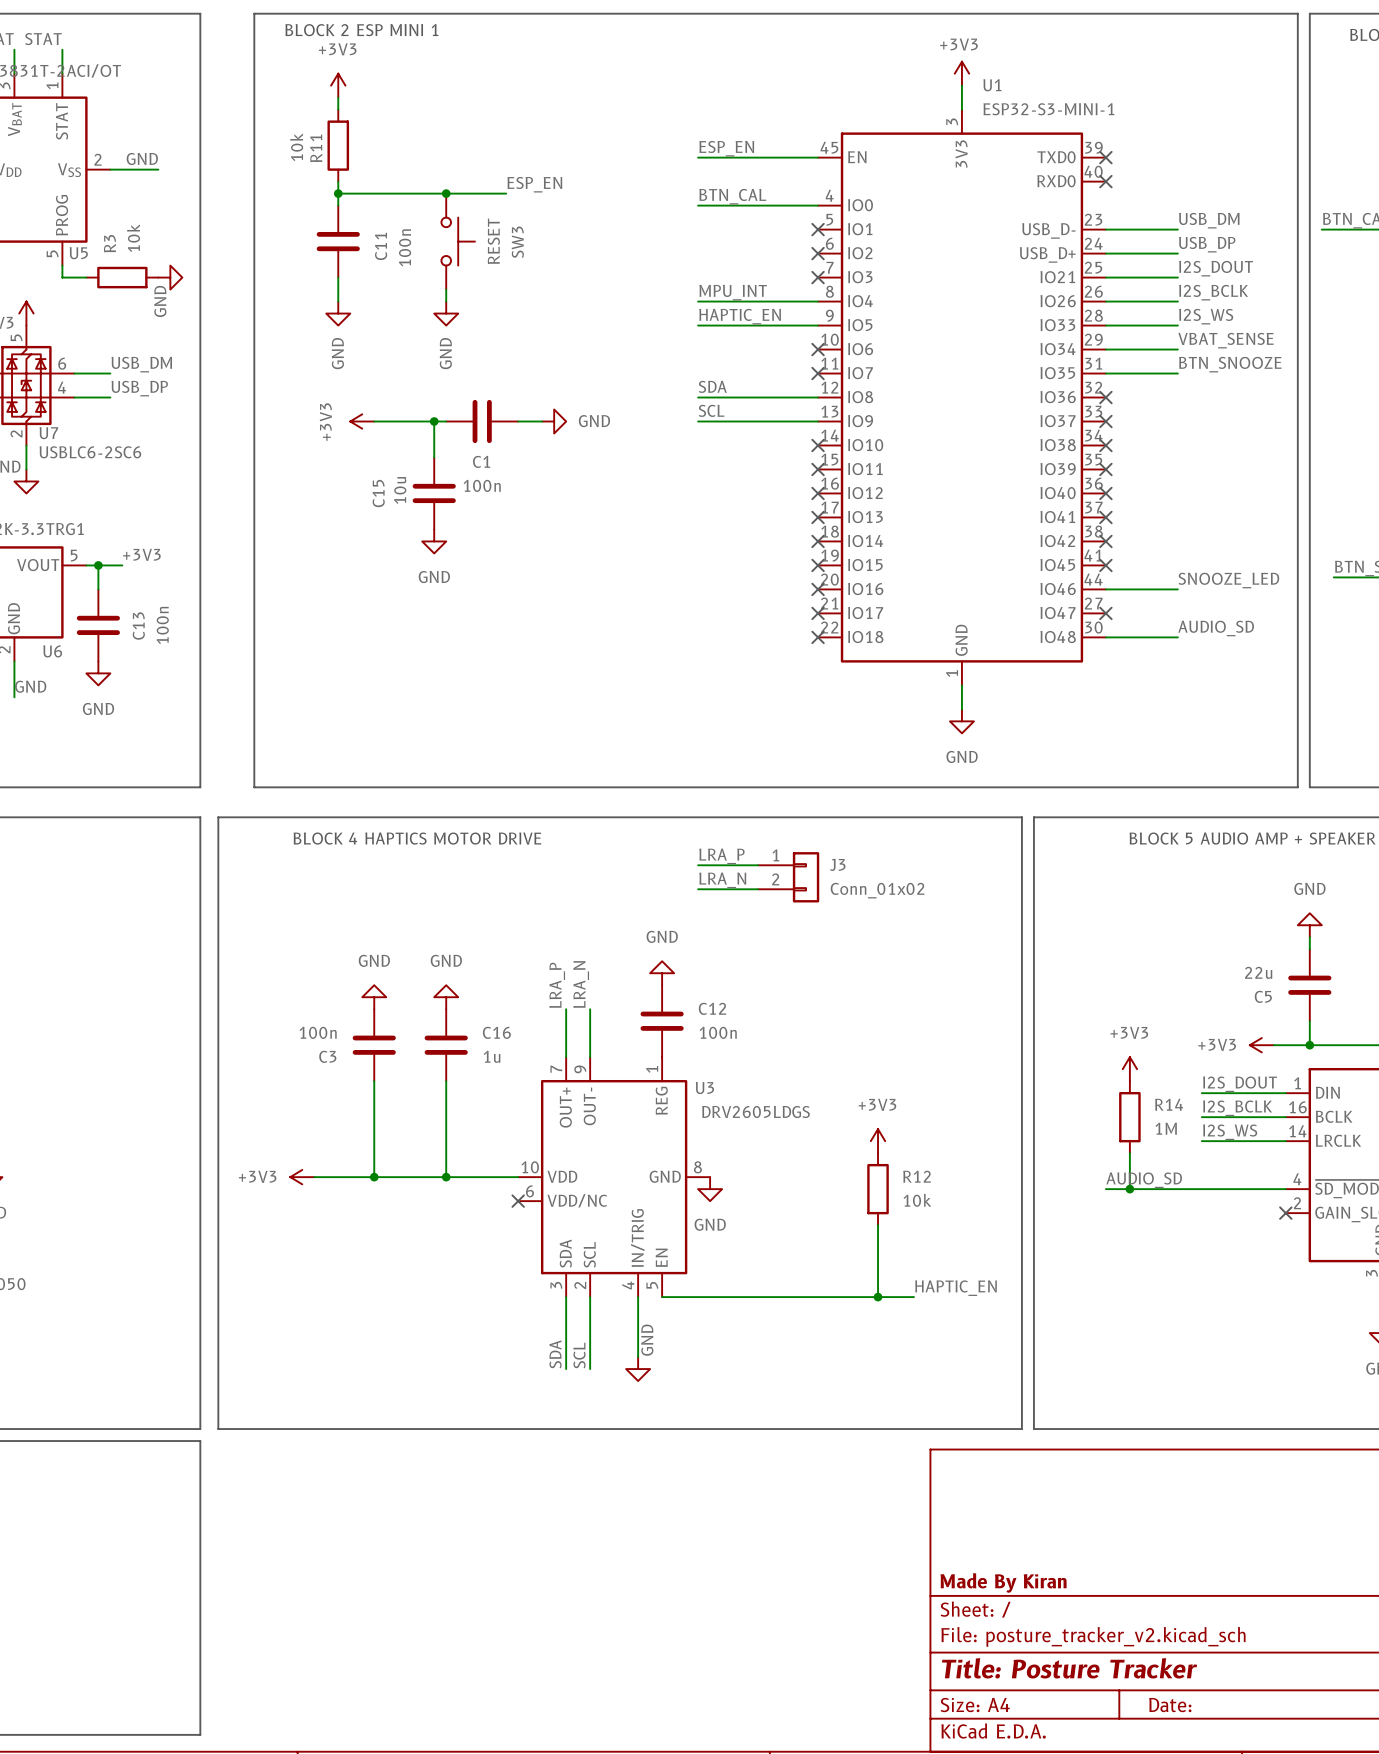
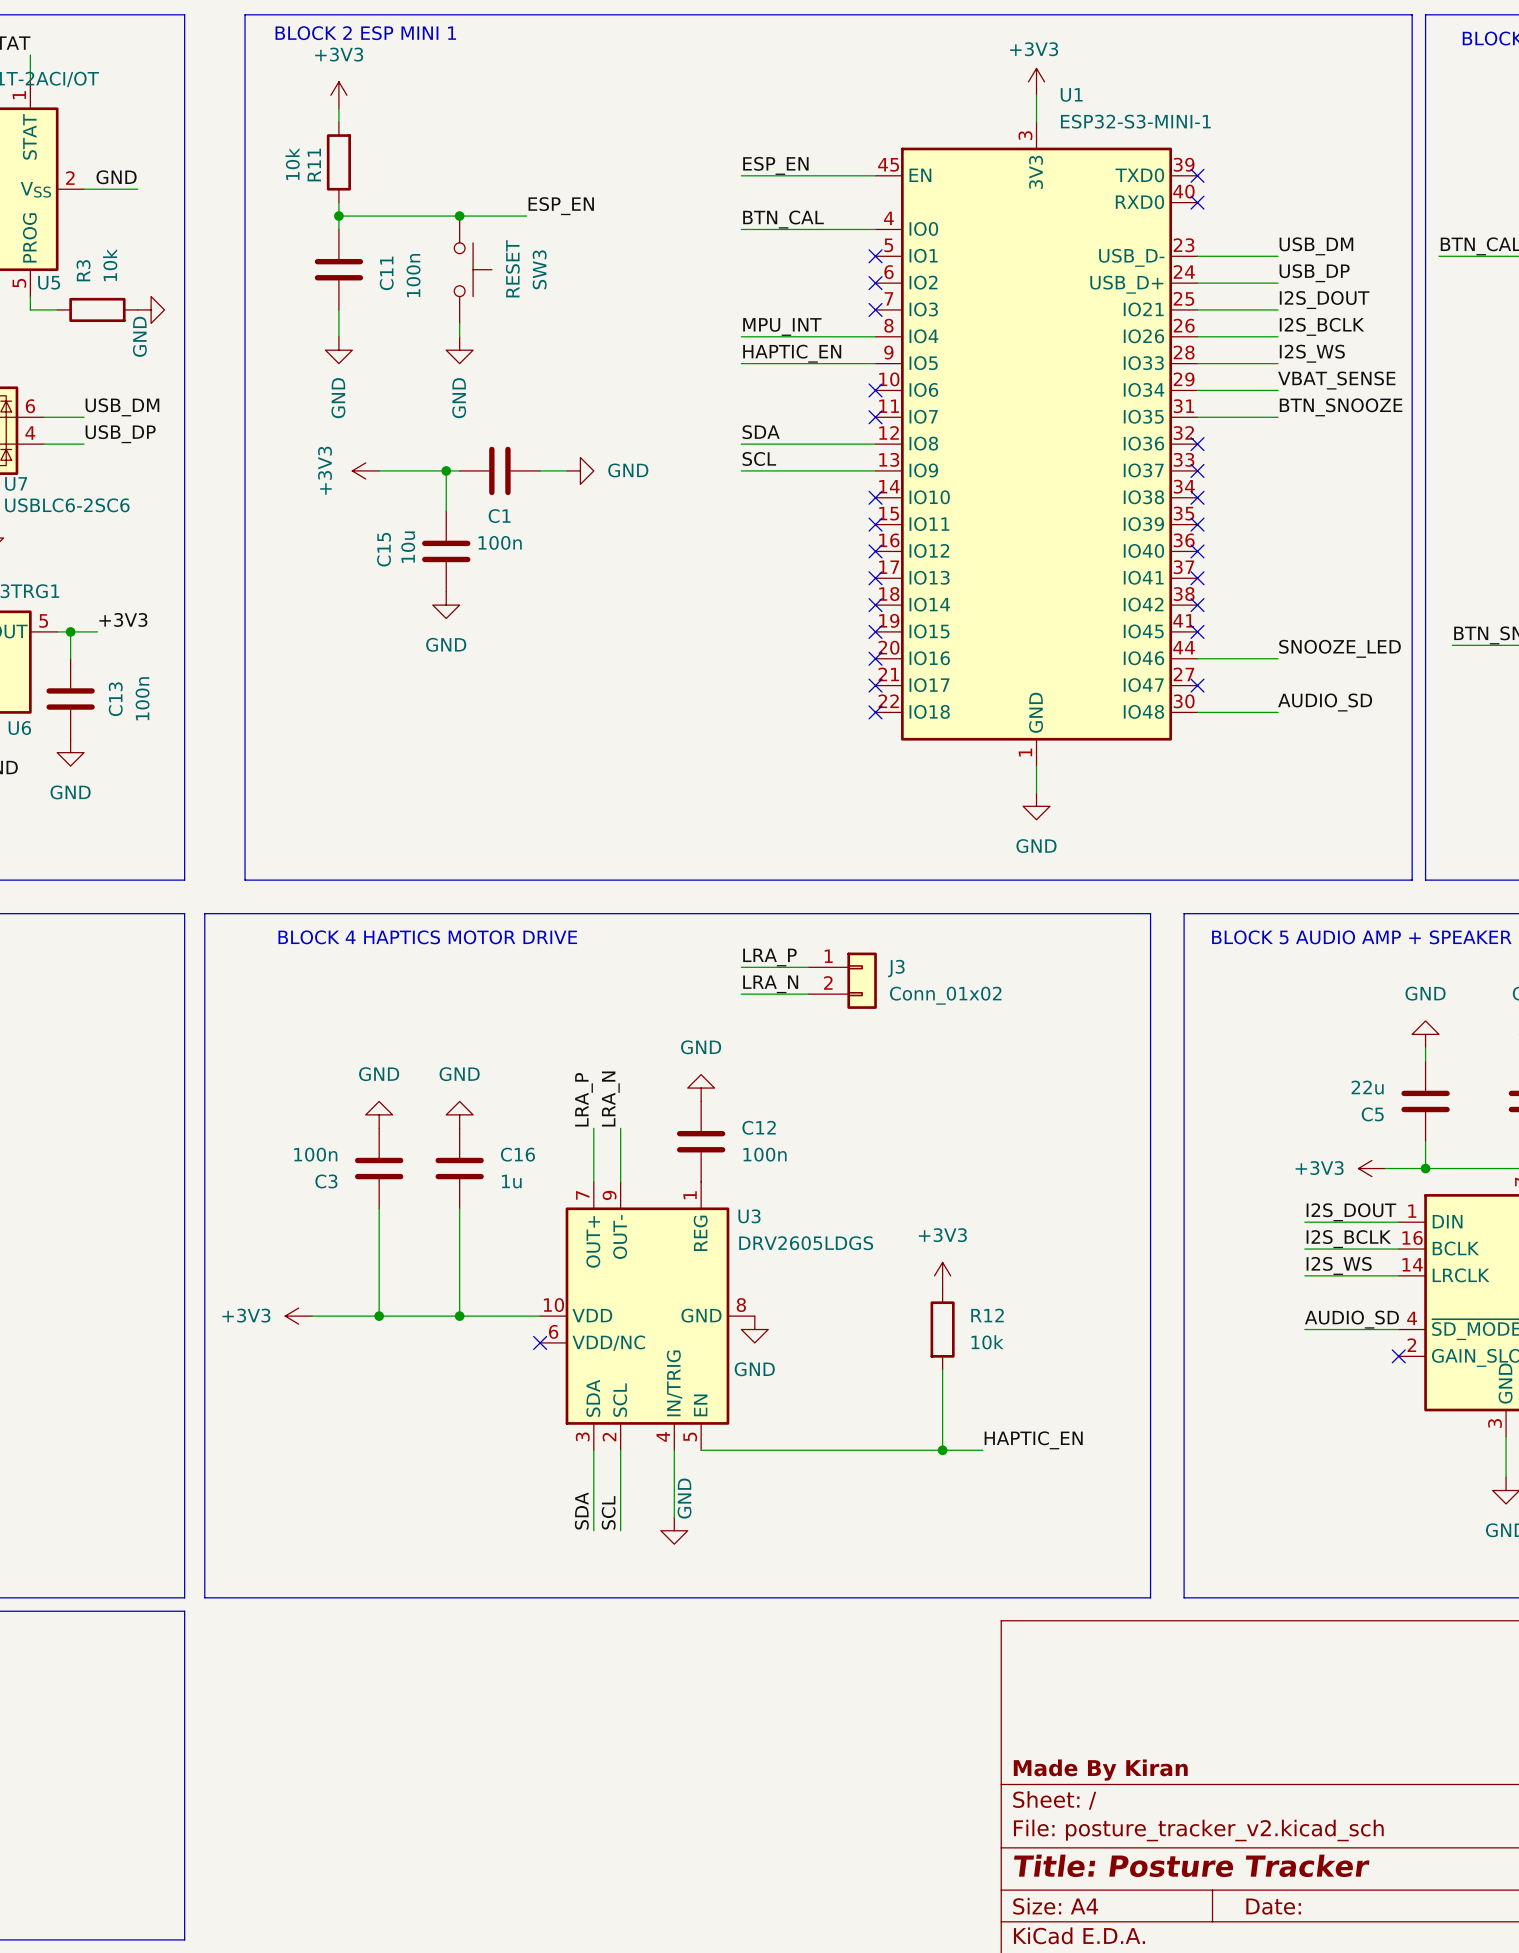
line: (1021, 817) (1021, 1429) -> (1103, 913) (1117, 913)
line: (1033, 817) (1033, 1429) -> (1103, 1597) (1117, 1597)
line: (1063, 817) (1093, 817) -> (1150, 913) (1150, 1597)
power symbol: +3V3 (1129, 1069) -> none
R14: 1M (1129, 1117) -> none
wire: (1129, 1153) (1129, 1189) -> none
label position: AUDIO_SD (1144, 1180) -> AUDIO_SD (1351, 1319)
wire: (1105, 1189) (1201, 1189) -> none
junction: (1129, 1189) -> none
line: (1063, 1429) (1093, 1429) -> (1184, 913) (1184, 1597)

